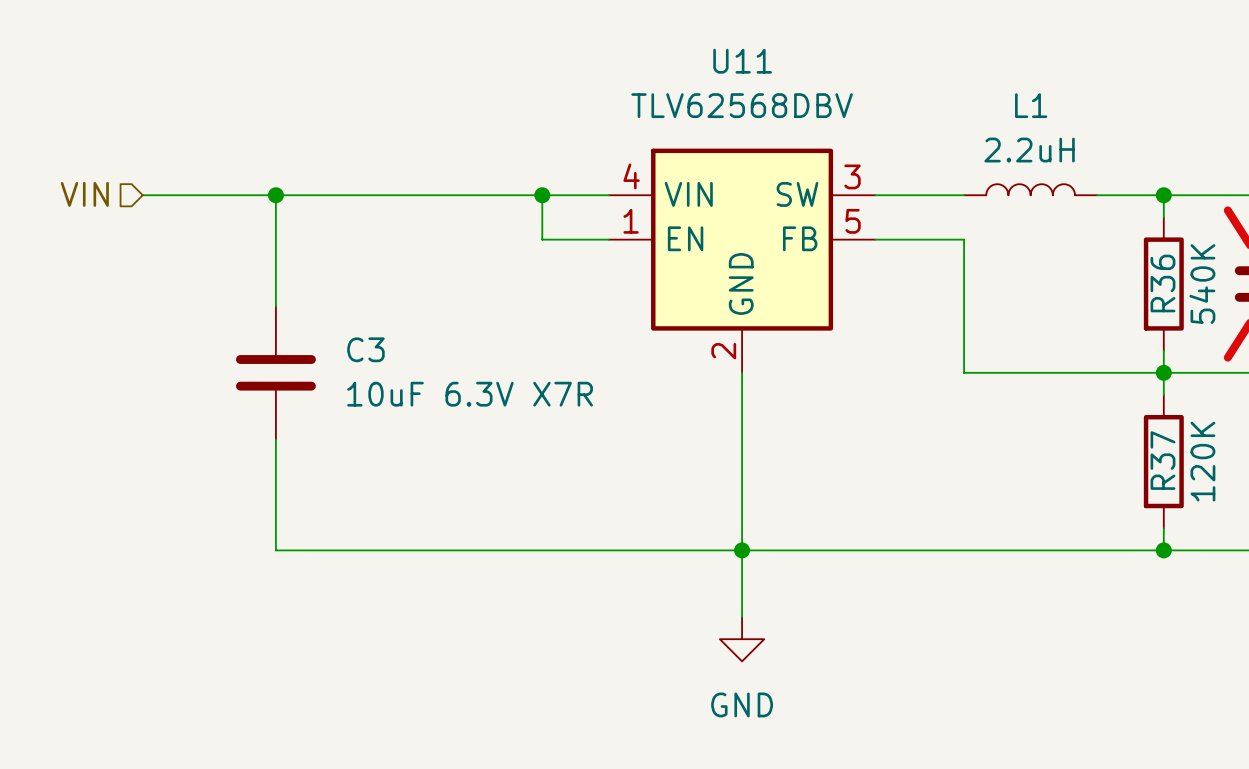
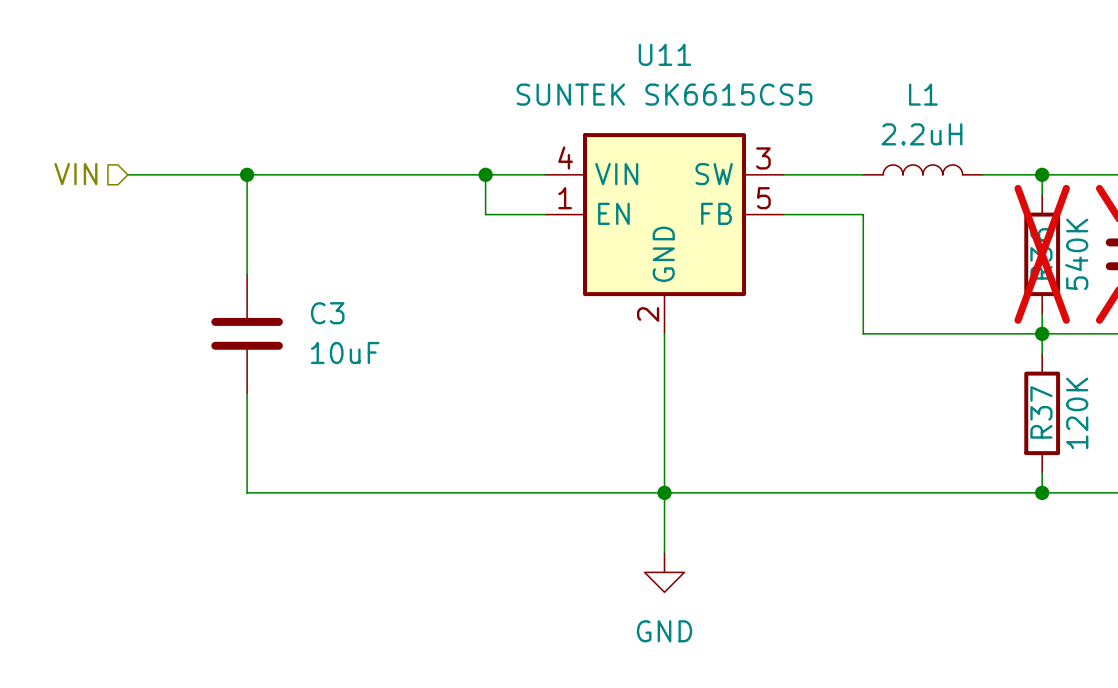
U11 value: TLV62568DBV (742, 105) -> SUNTEK SK6615CS5 (664, 94)
R36 do-not-place cross: none -> (1042, 254)
C3 value: 10uF 6.3V X7R (470, 394) -> 10uF (345, 352)

